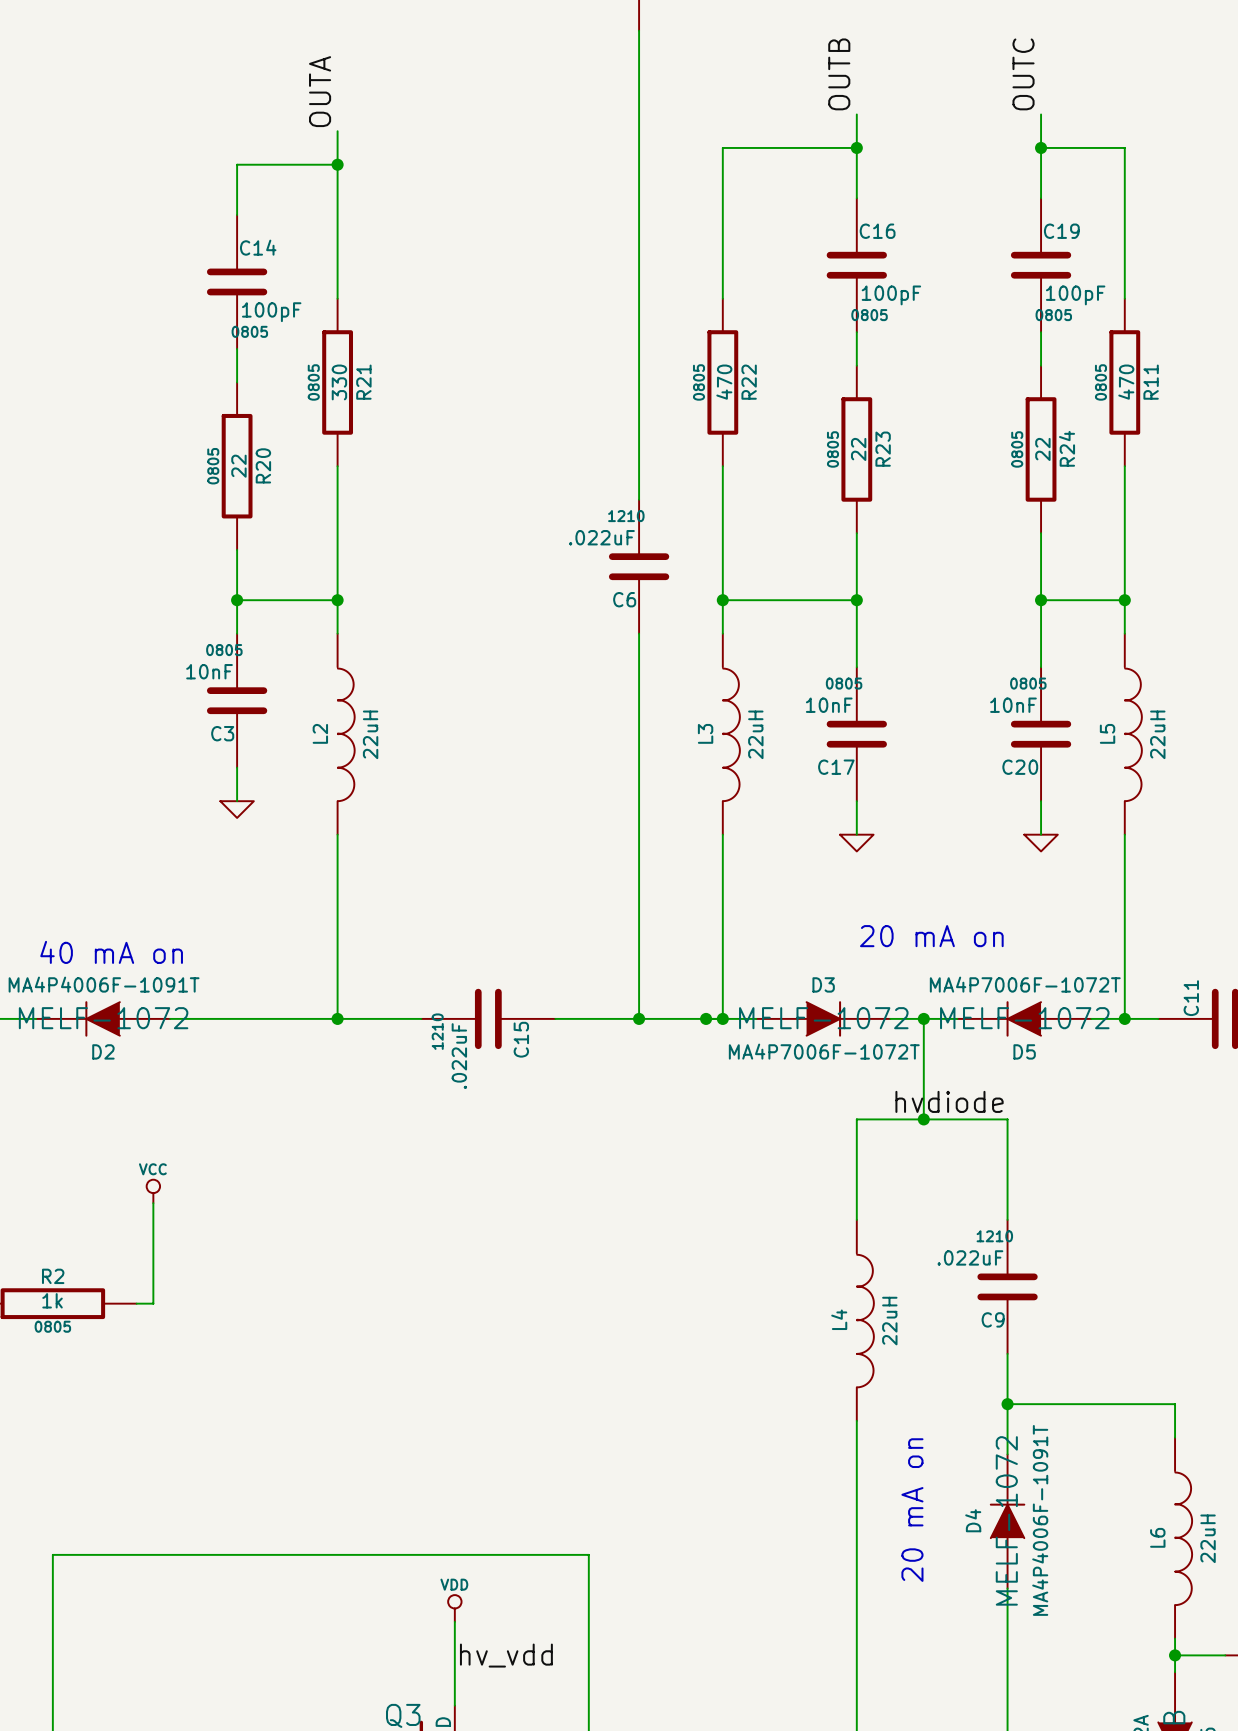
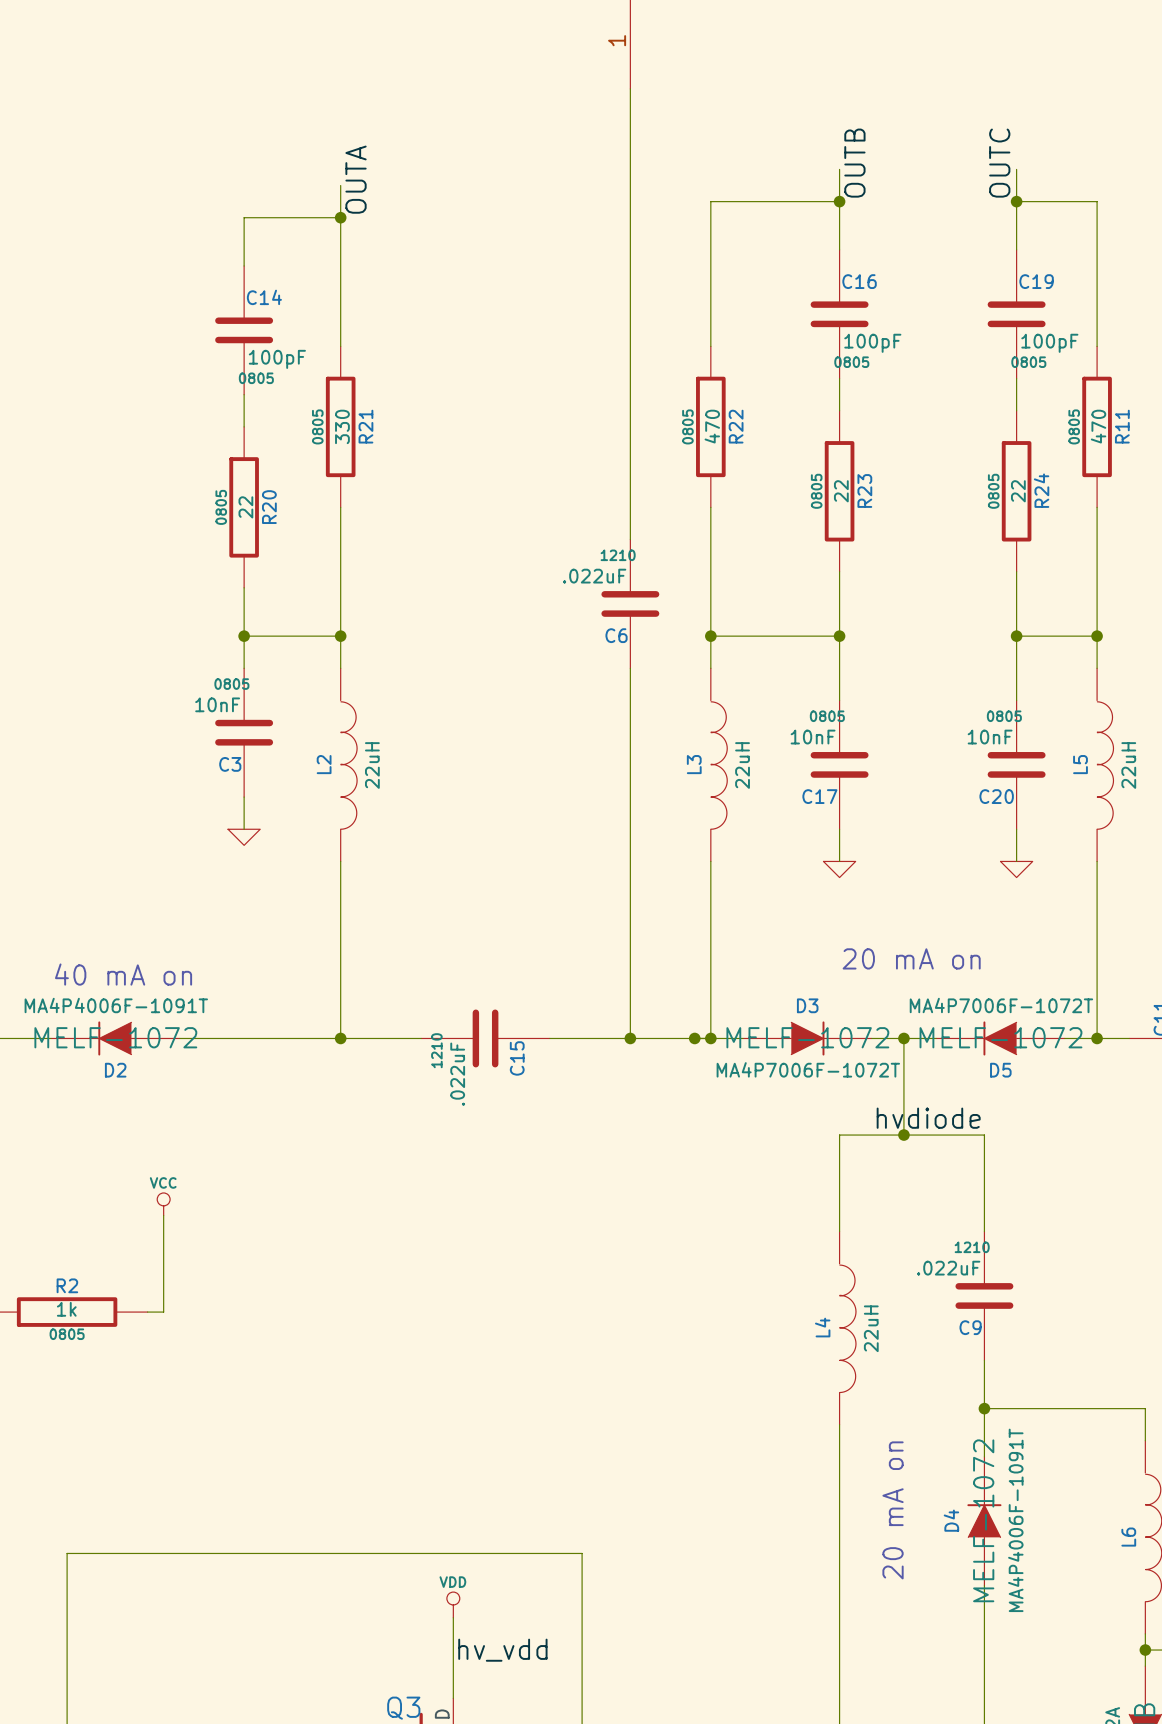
label position: OUTB (839, 74) -> OUTB (854, 163)
label position: OUTC (1023, 74) -> OUTC (999, 163)
label position: OUTA (320, 91) -> OUTA (356, 179)

